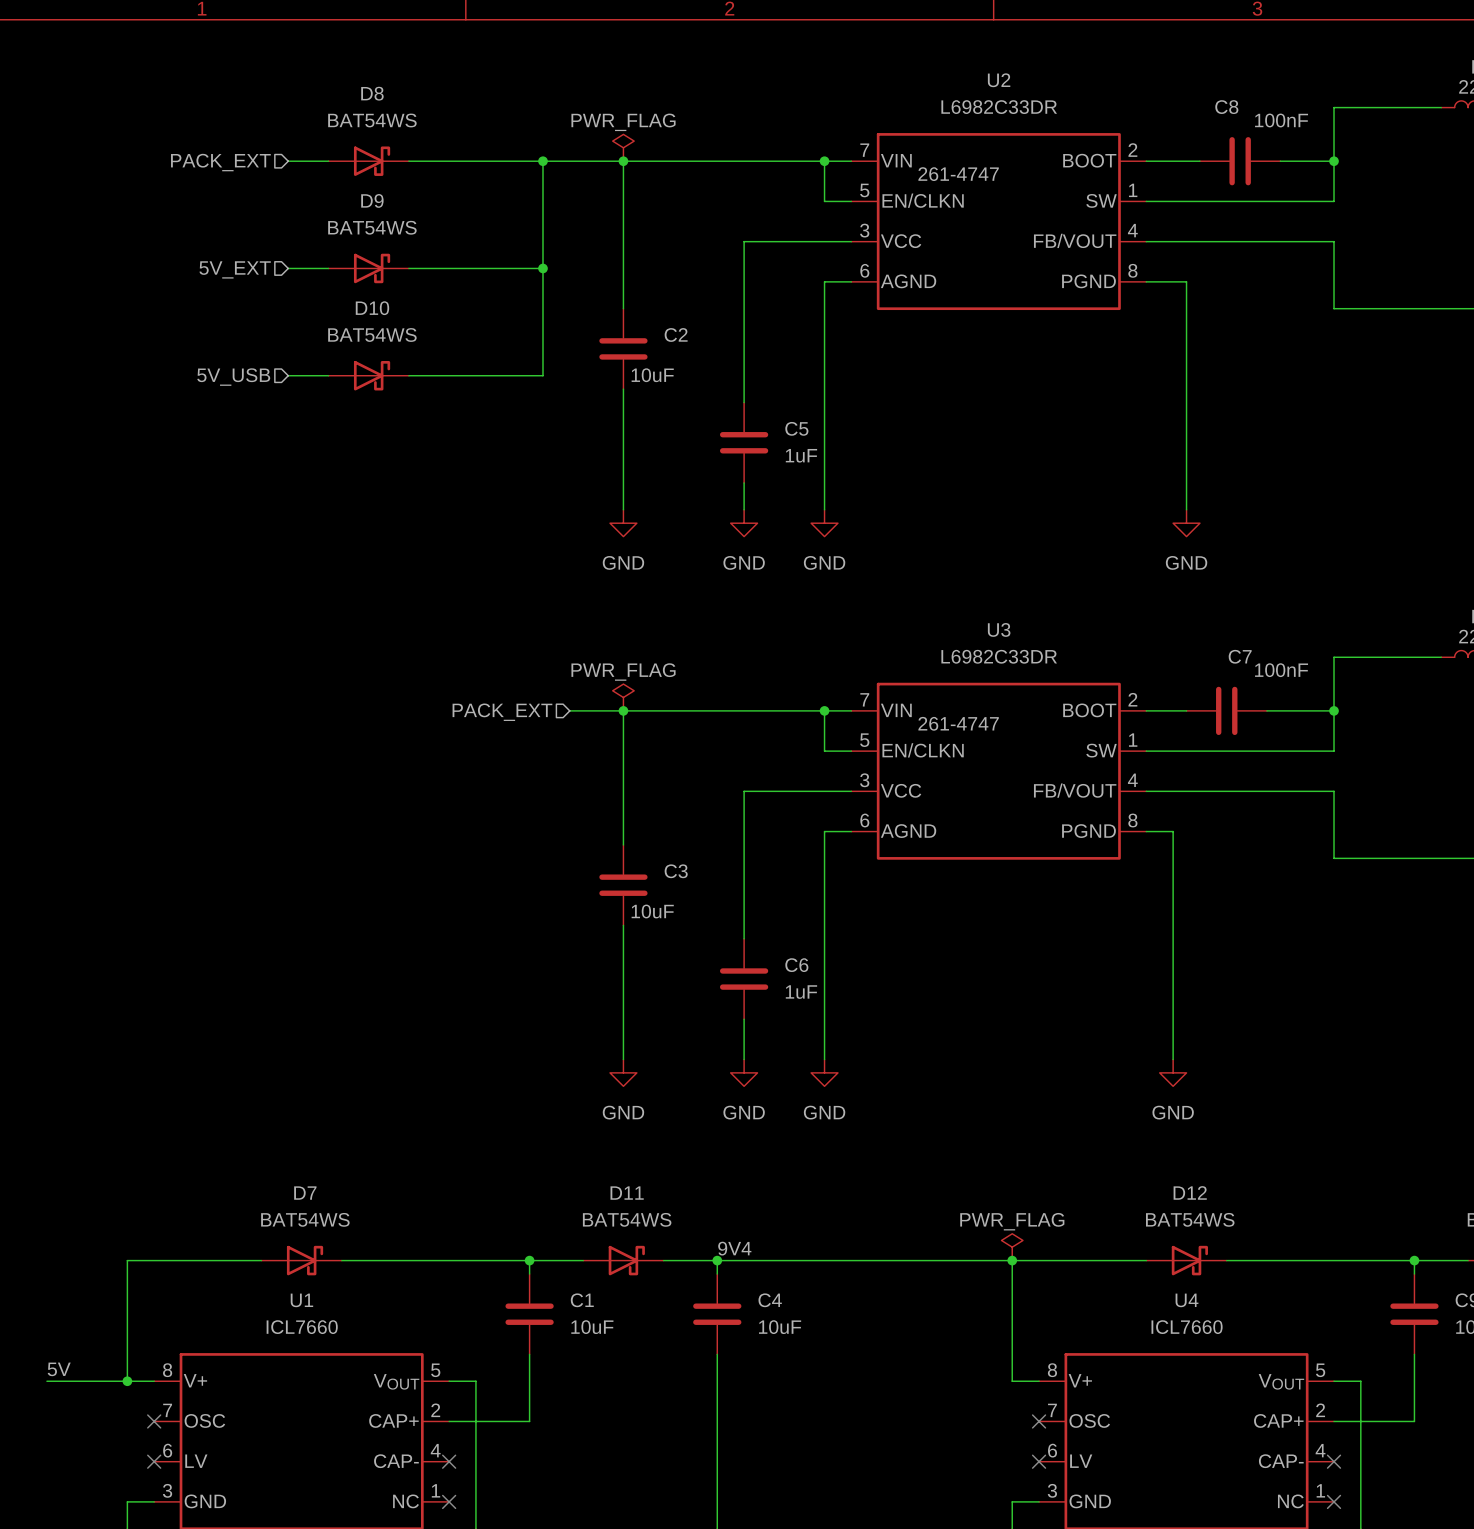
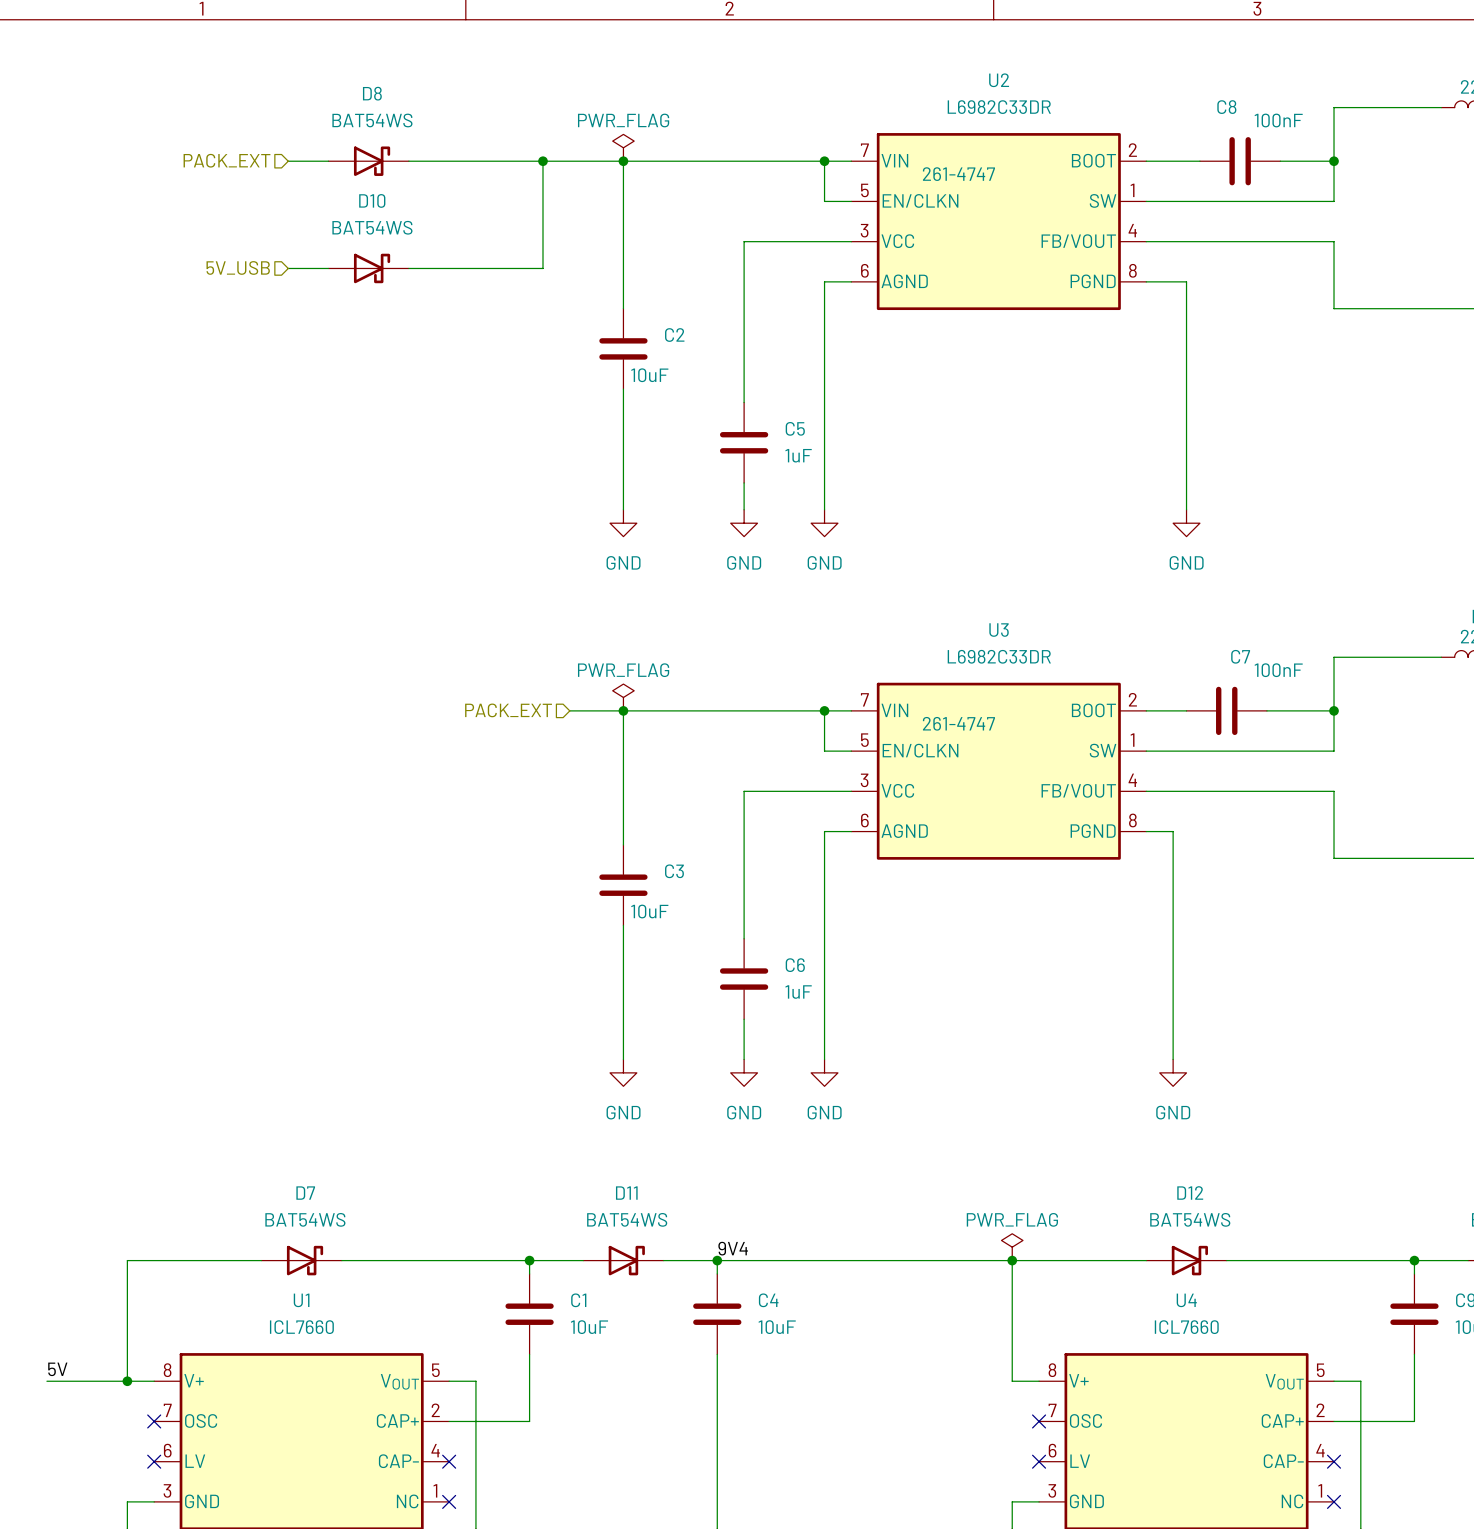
D9 name: D9 (372, 200) -> D10 (372, 200)
wire: (542, 268) (542, 375) (408, 375) -> none
junction: (542, 268) -> none
hierarchical label: 5V_EXT (235, 269) -> 5V_USB (238, 267)
wire: (288, 375) (328, 375) -> none
D10: BAT54WS (368, 375) -> none
hierarchical label: 5V_USB (233, 377) -> none

